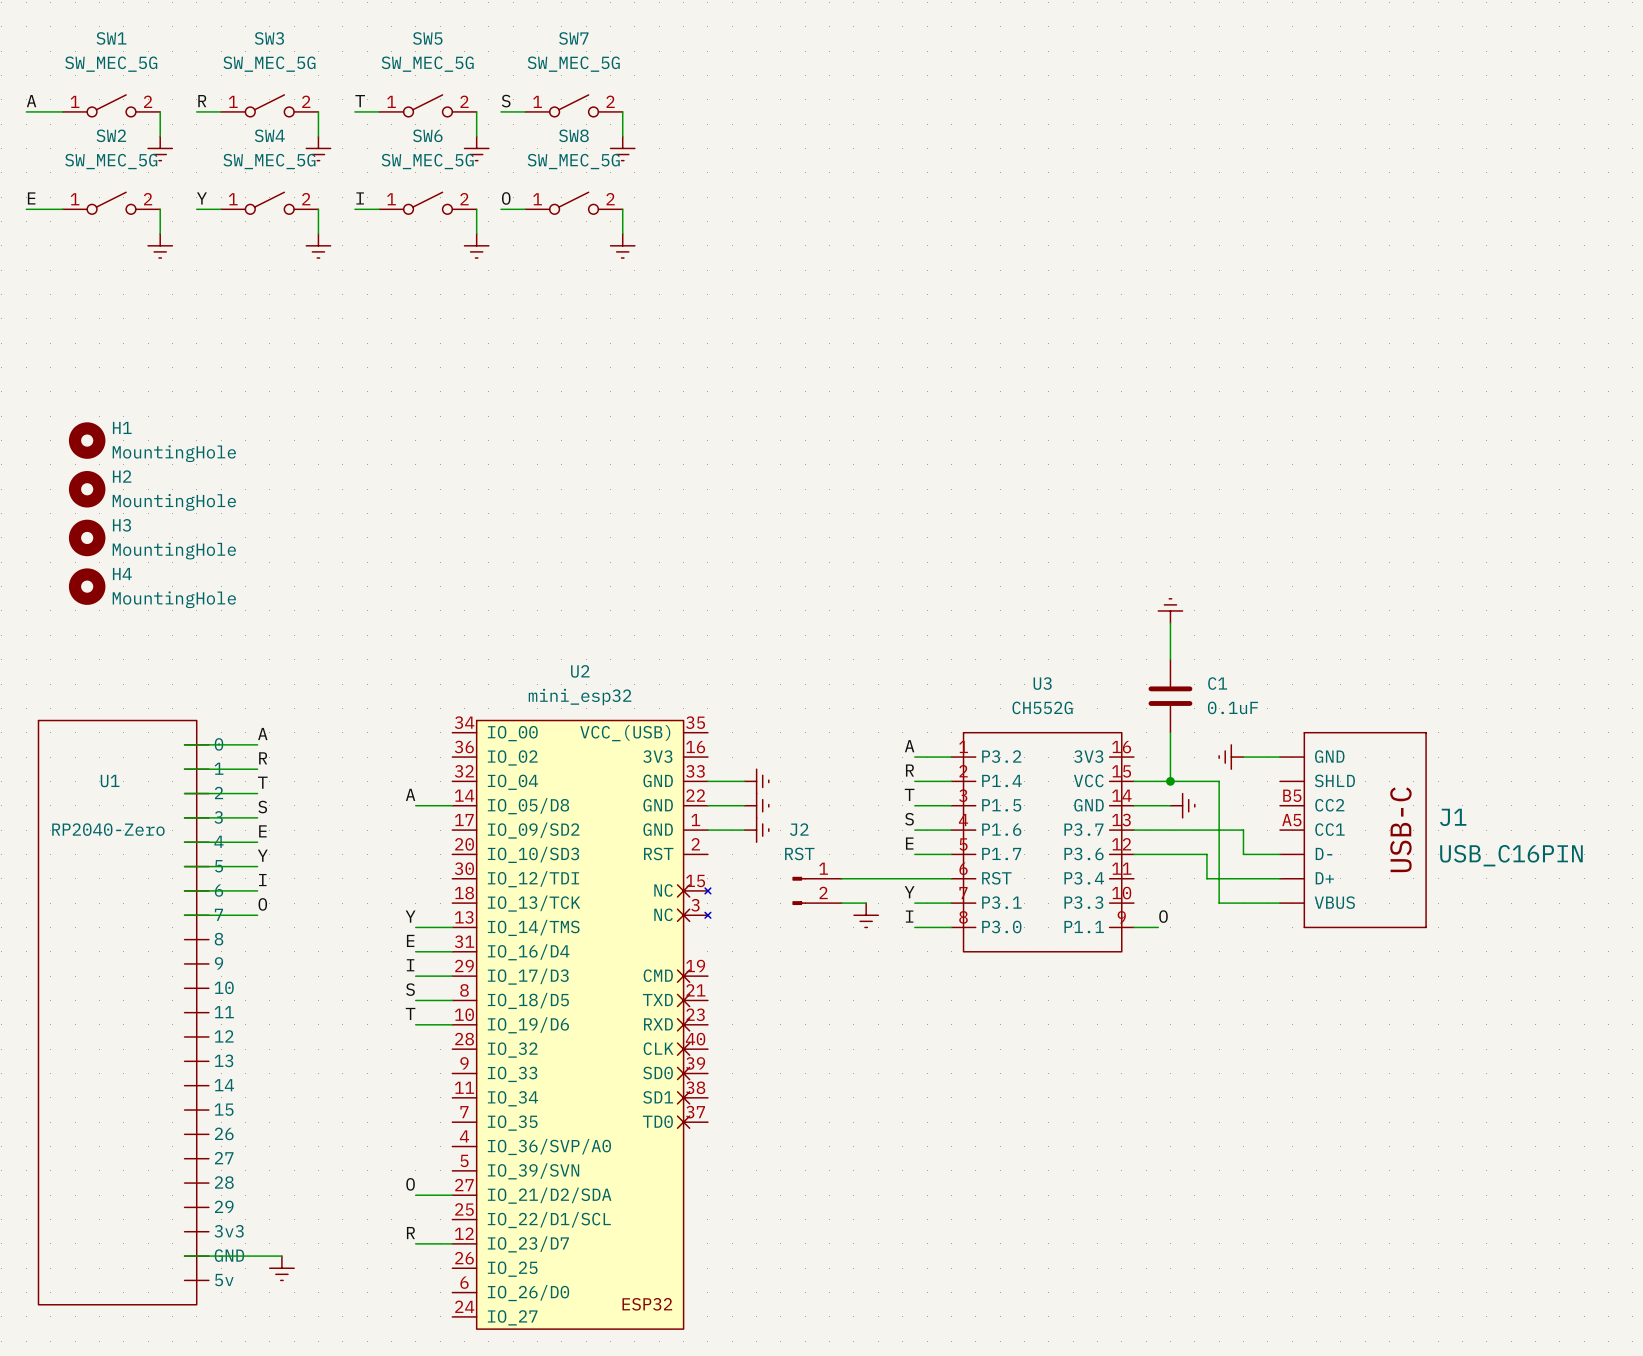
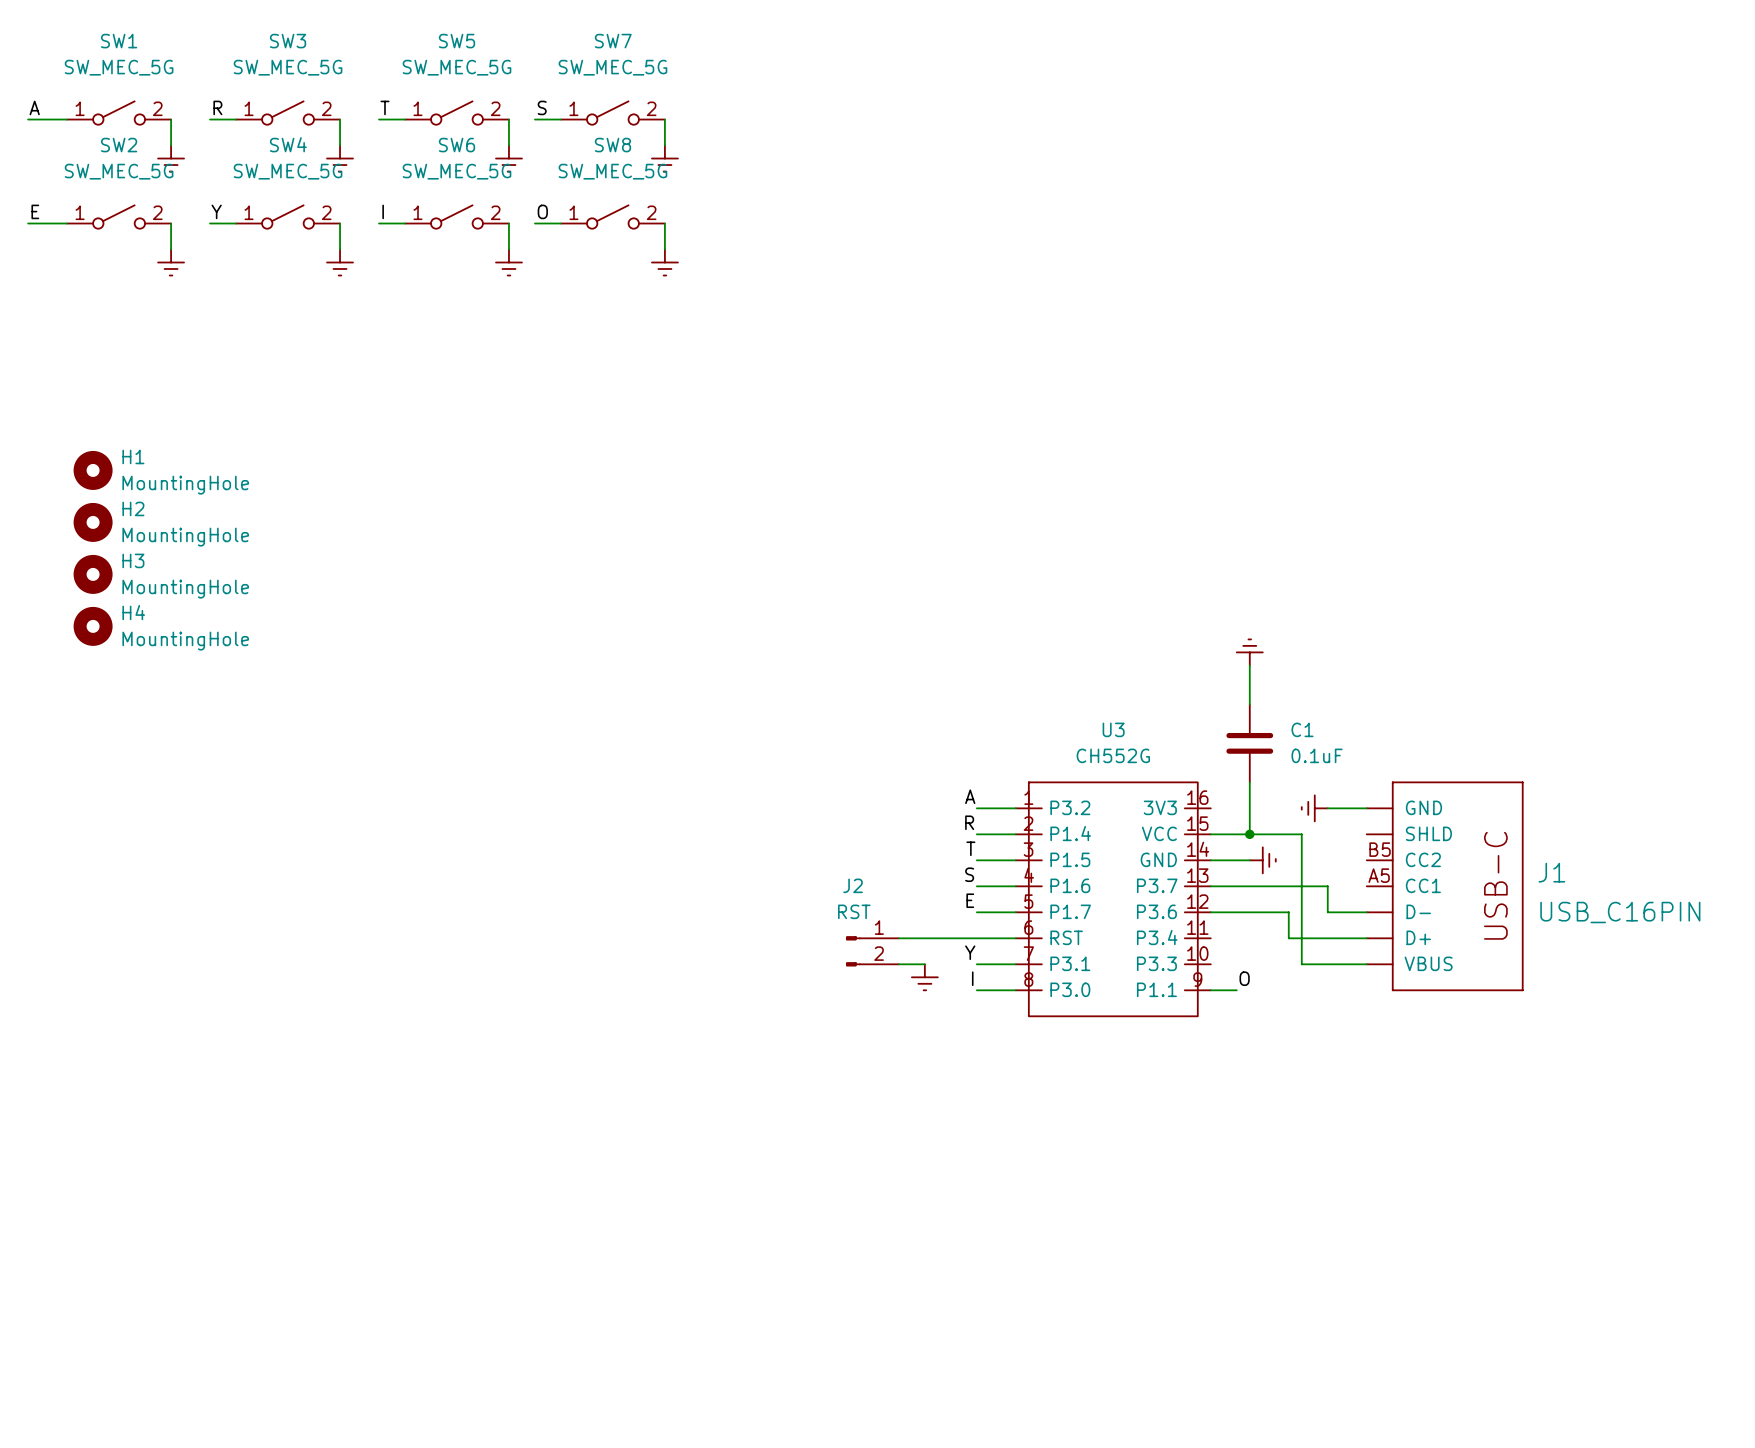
label: A (262, 734) -> none
wire: (184, 744) (257, 744) -> none
label: R (263, 758) -> none
wire: (184, 769) (257, 769) -> none
wire: (707, 781) (744, 781) -> none
power symbol: (756, 781) -> none
label: T (262, 782) -> none
wire: (184, 793) (257, 793) -> none
label: A (410, 794) -> none
wire: (415, 805) (452, 805) -> none
wire: (707, 805) (744, 805) -> none
power symbol: (756, 805) -> none
label: S (262, 807) -> none
wire: (184, 817) (257, 817) -> none
wire: (707, 830) (744, 830) -> none
power symbol: (756, 830) -> none
label: E (262, 831) -> none
wire: (184, 842) (257, 842) -> none
label: Y (262, 855) -> none
wire: (184, 866) (257, 866) -> none
label: I (262, 880) -> none
wire: (184, 890) (257, 890) -> none
label: O (262, 904) -> none
wire: (184, 915) (257, 915) -> none
label: Y (410, 916) -> none
wire: (415, 927) (452, 927) -> none
label: E (410, 940) -> none
wire: (415, 951) (452, 951) -> none
label: I (410, 965) -> none
wire: (415, 976) (452, 976) -> none
label: S (410, 989) -> none
wire: (415, 1000) (452, 1000) -> none
U1: RP2040-Zero (123, 1012) -> none
label: T (410, 1013) -> none
wire: (415, 1024) (452, 1024) -> none
U2: mini_esp32 (581, 1024) -> none
label: O (410, 1184) -> none
wire: (415, 1195) (452, 1195) -> none
label: R (410, 1233) -> none
wire: (415, 1243) (452, 1243) -> none
wire: (184, 1256) (281, 1256) -> none
power symbol: (281, 1268) -> none

